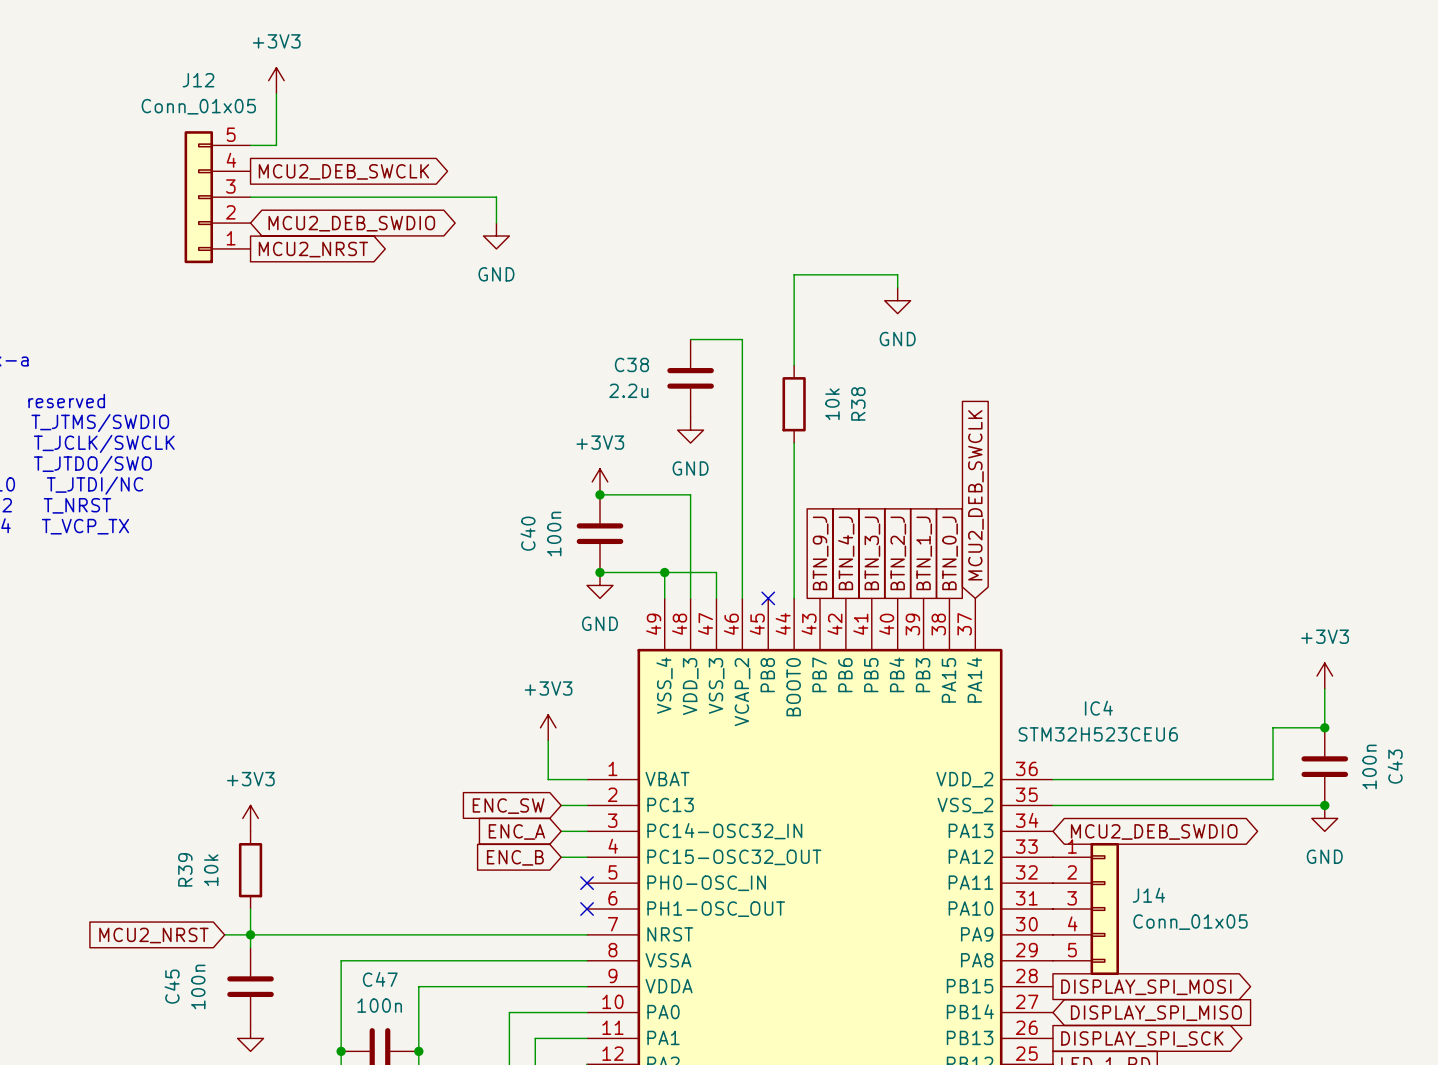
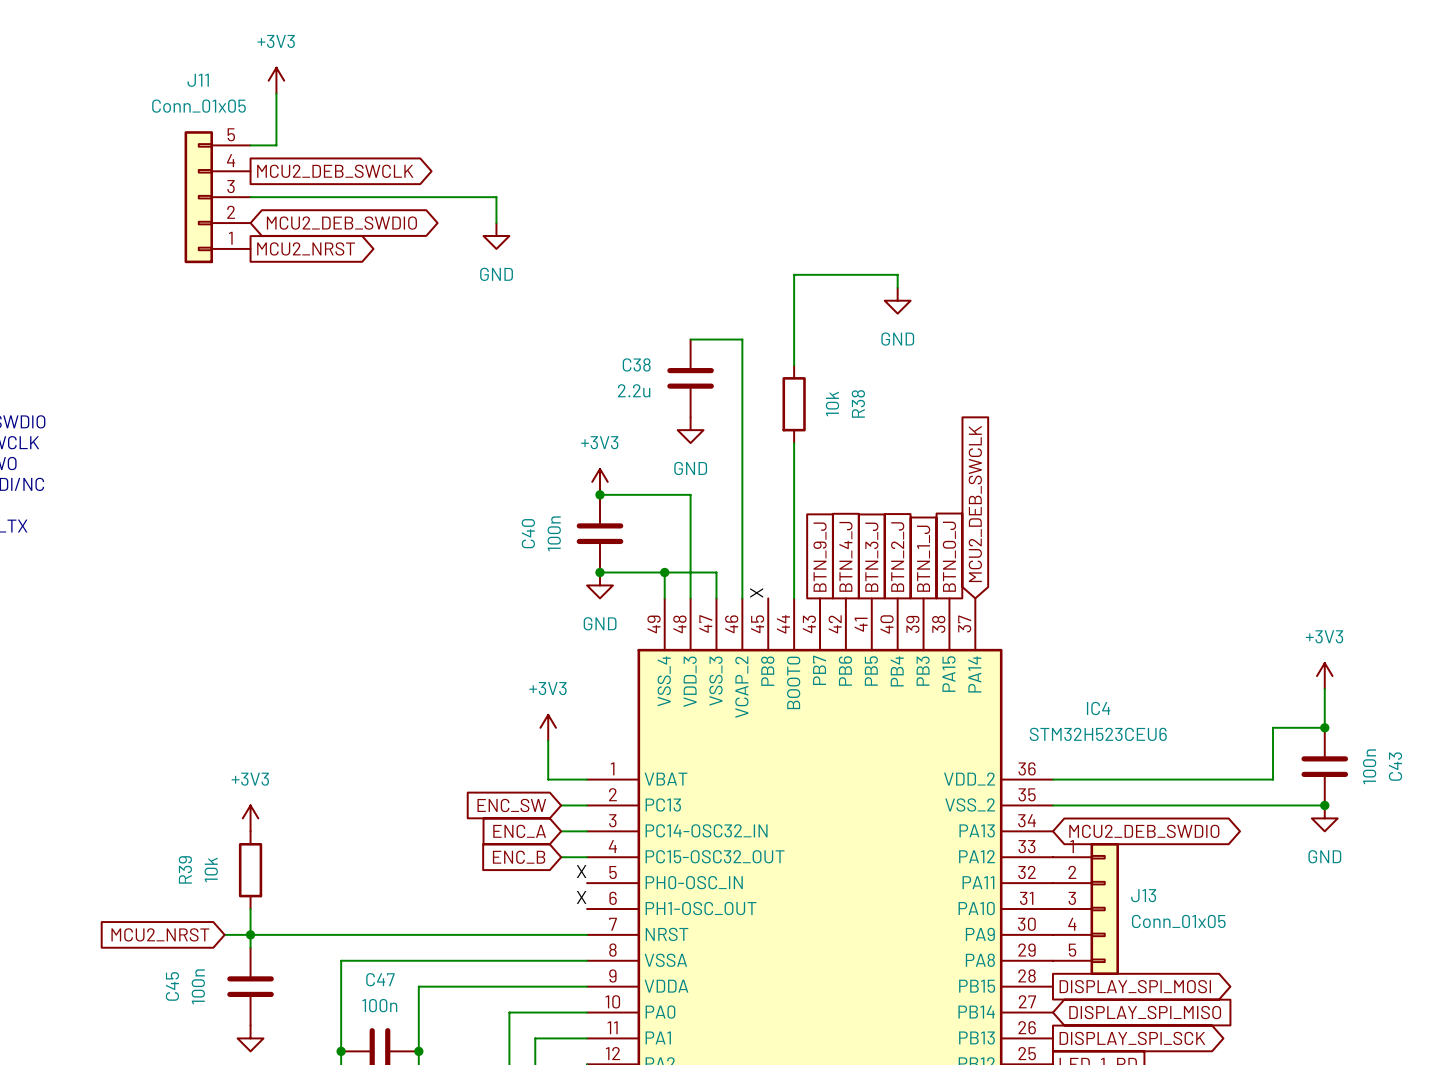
J12 name: J12 (198, 80) -> J11 (198, 80)
label: none -> X (756, 592)
no-connect mark: (768, 598) -> none
label: none -> X (581, 871)
no-connect mark: (587, 883) -> none
J14 name: J14 (1148, 895) -> J13 (1143, 895)
label: none -> X (581, 897)
no-connect mark: (587, 909) -> none

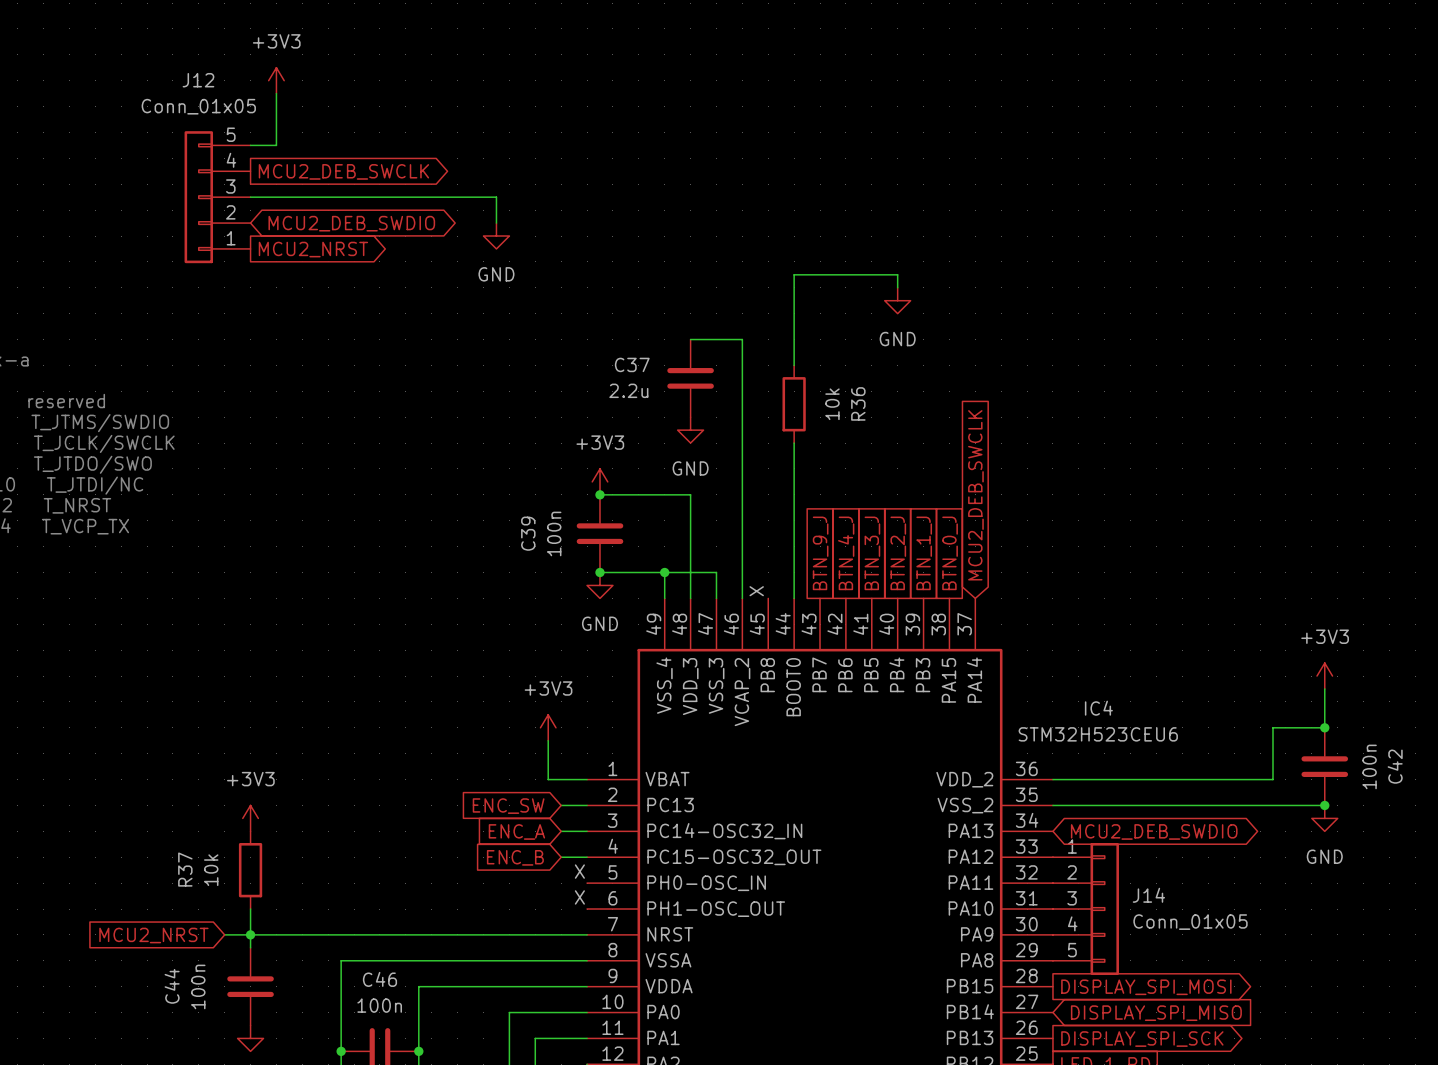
J11 name: J11 (198, 80) -> J12 (198, 80)
C38 name: C38 (636, 364) -> C37 (632, 364)
R38 name: R38 (858, 403) -> R36 (858, 403)
C40 name: C40 (528, 533) -> C39 (528, 533)
C43 name: C43 (1395, 766) -> C42 (1395, 766)
R39 name: R39 (185, 869) -> R37 (185, 869)
J13 name: J13 (1143, 895) -> J14 (1148, 895)
C47 name: C47 (380, 979) -> C46 (379, 979)
C45 name: C45 (172, 986) -> C44 (172, 986)

